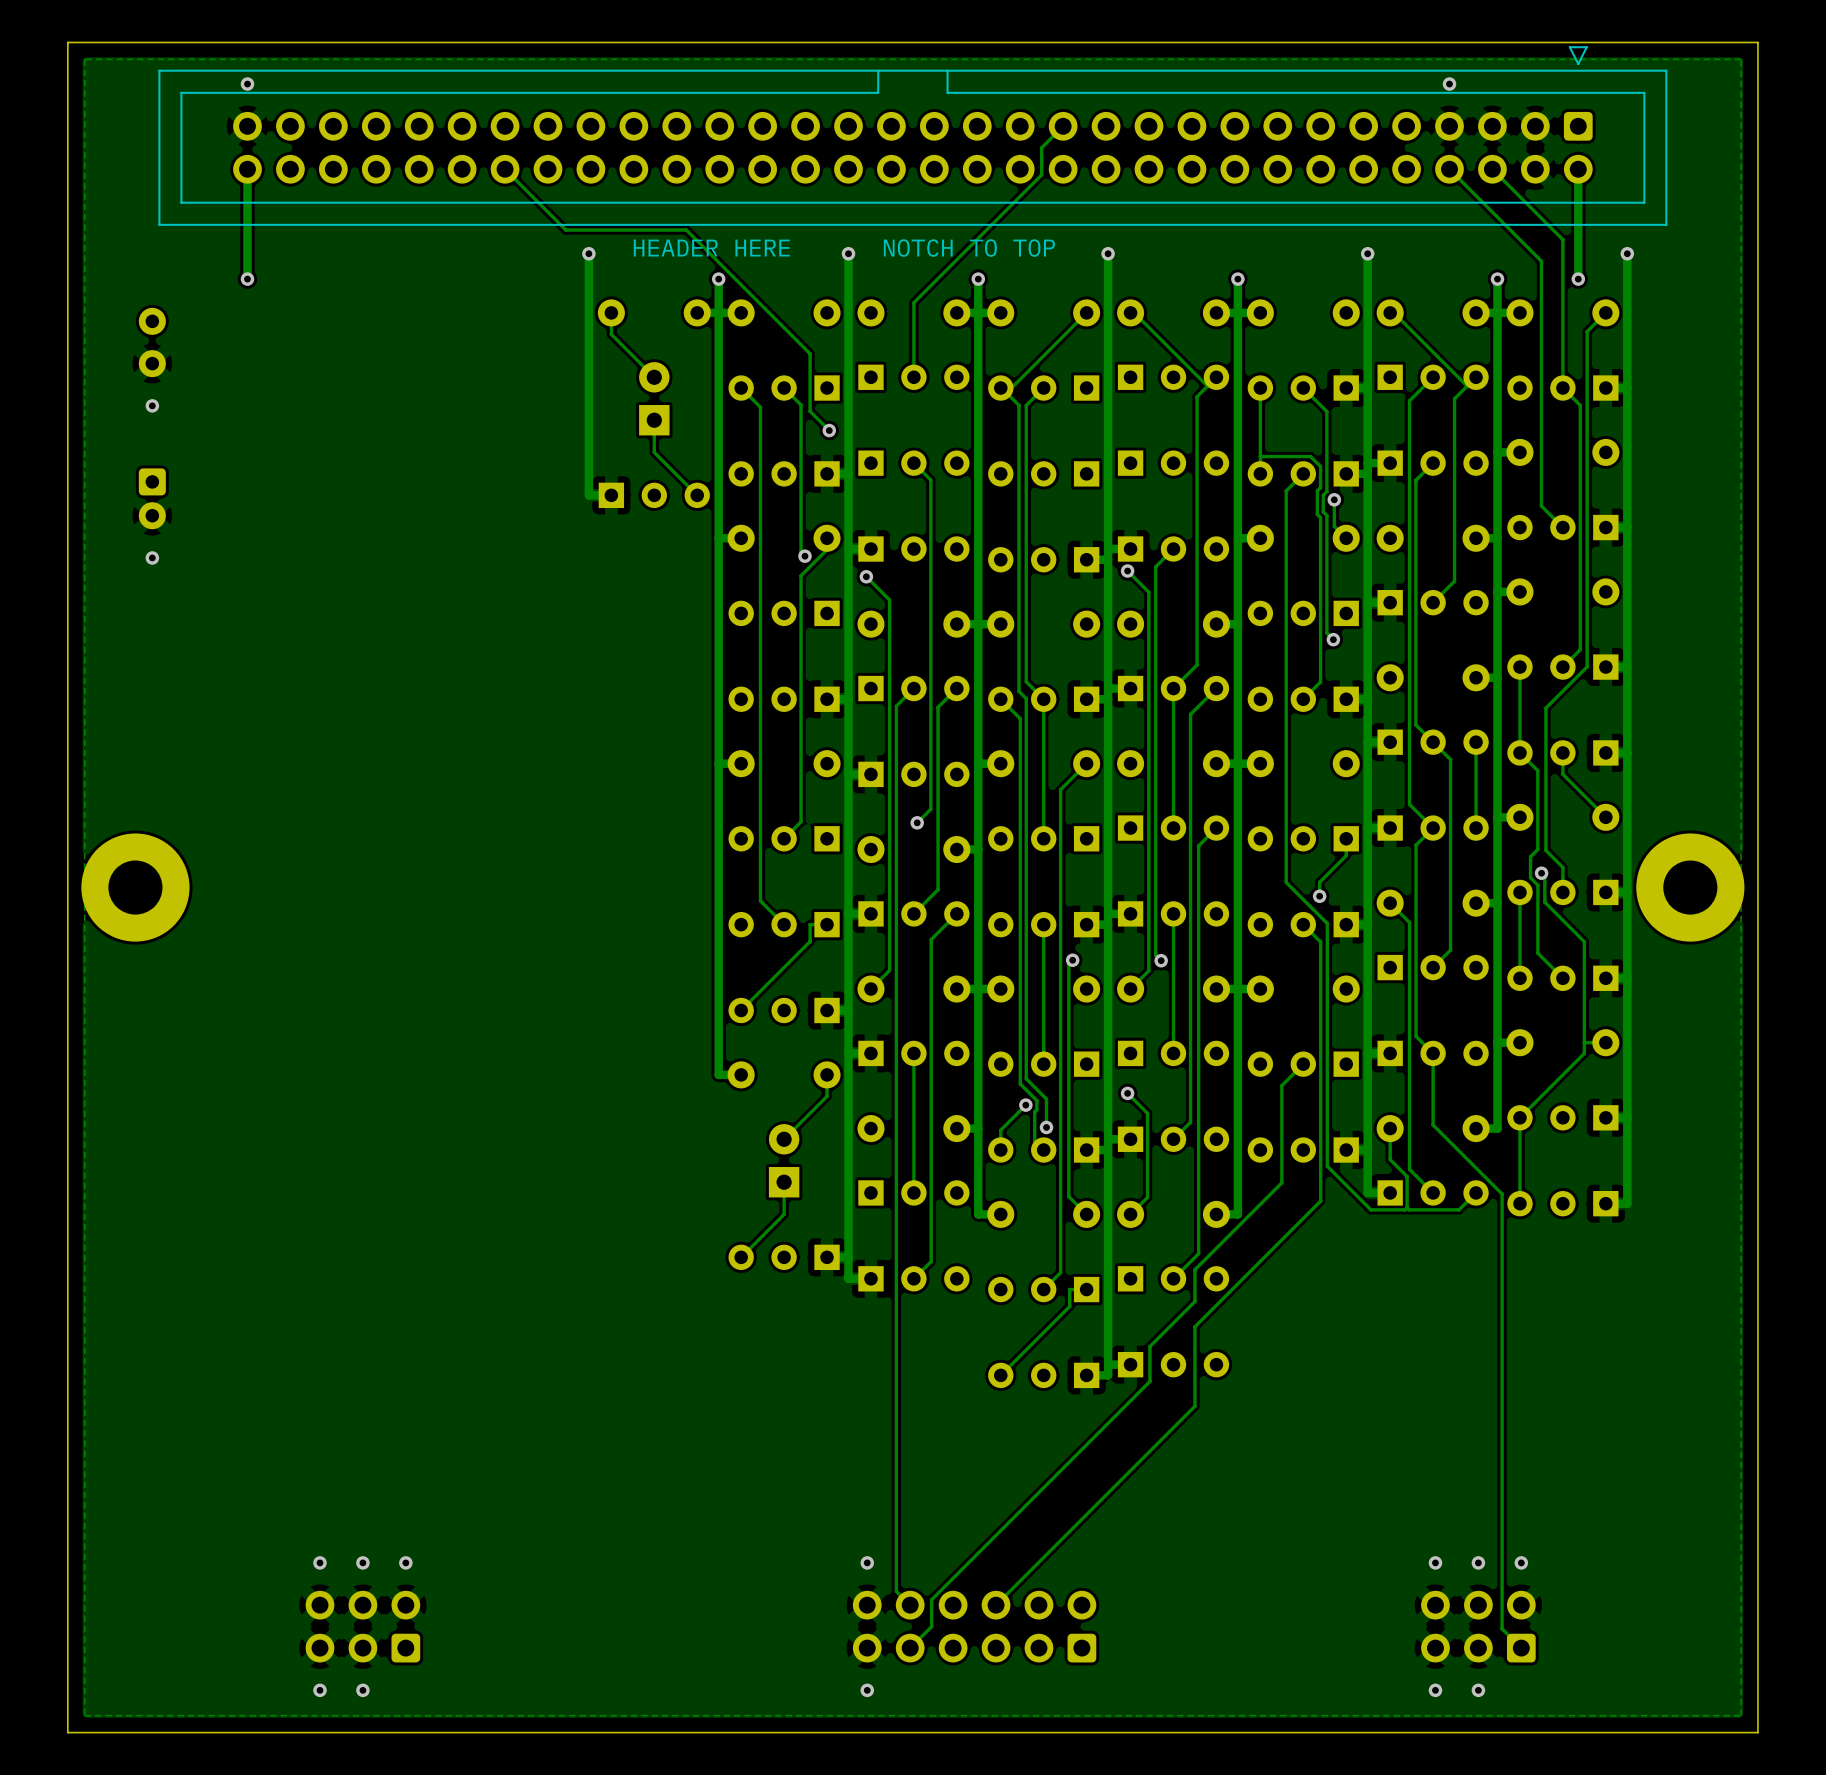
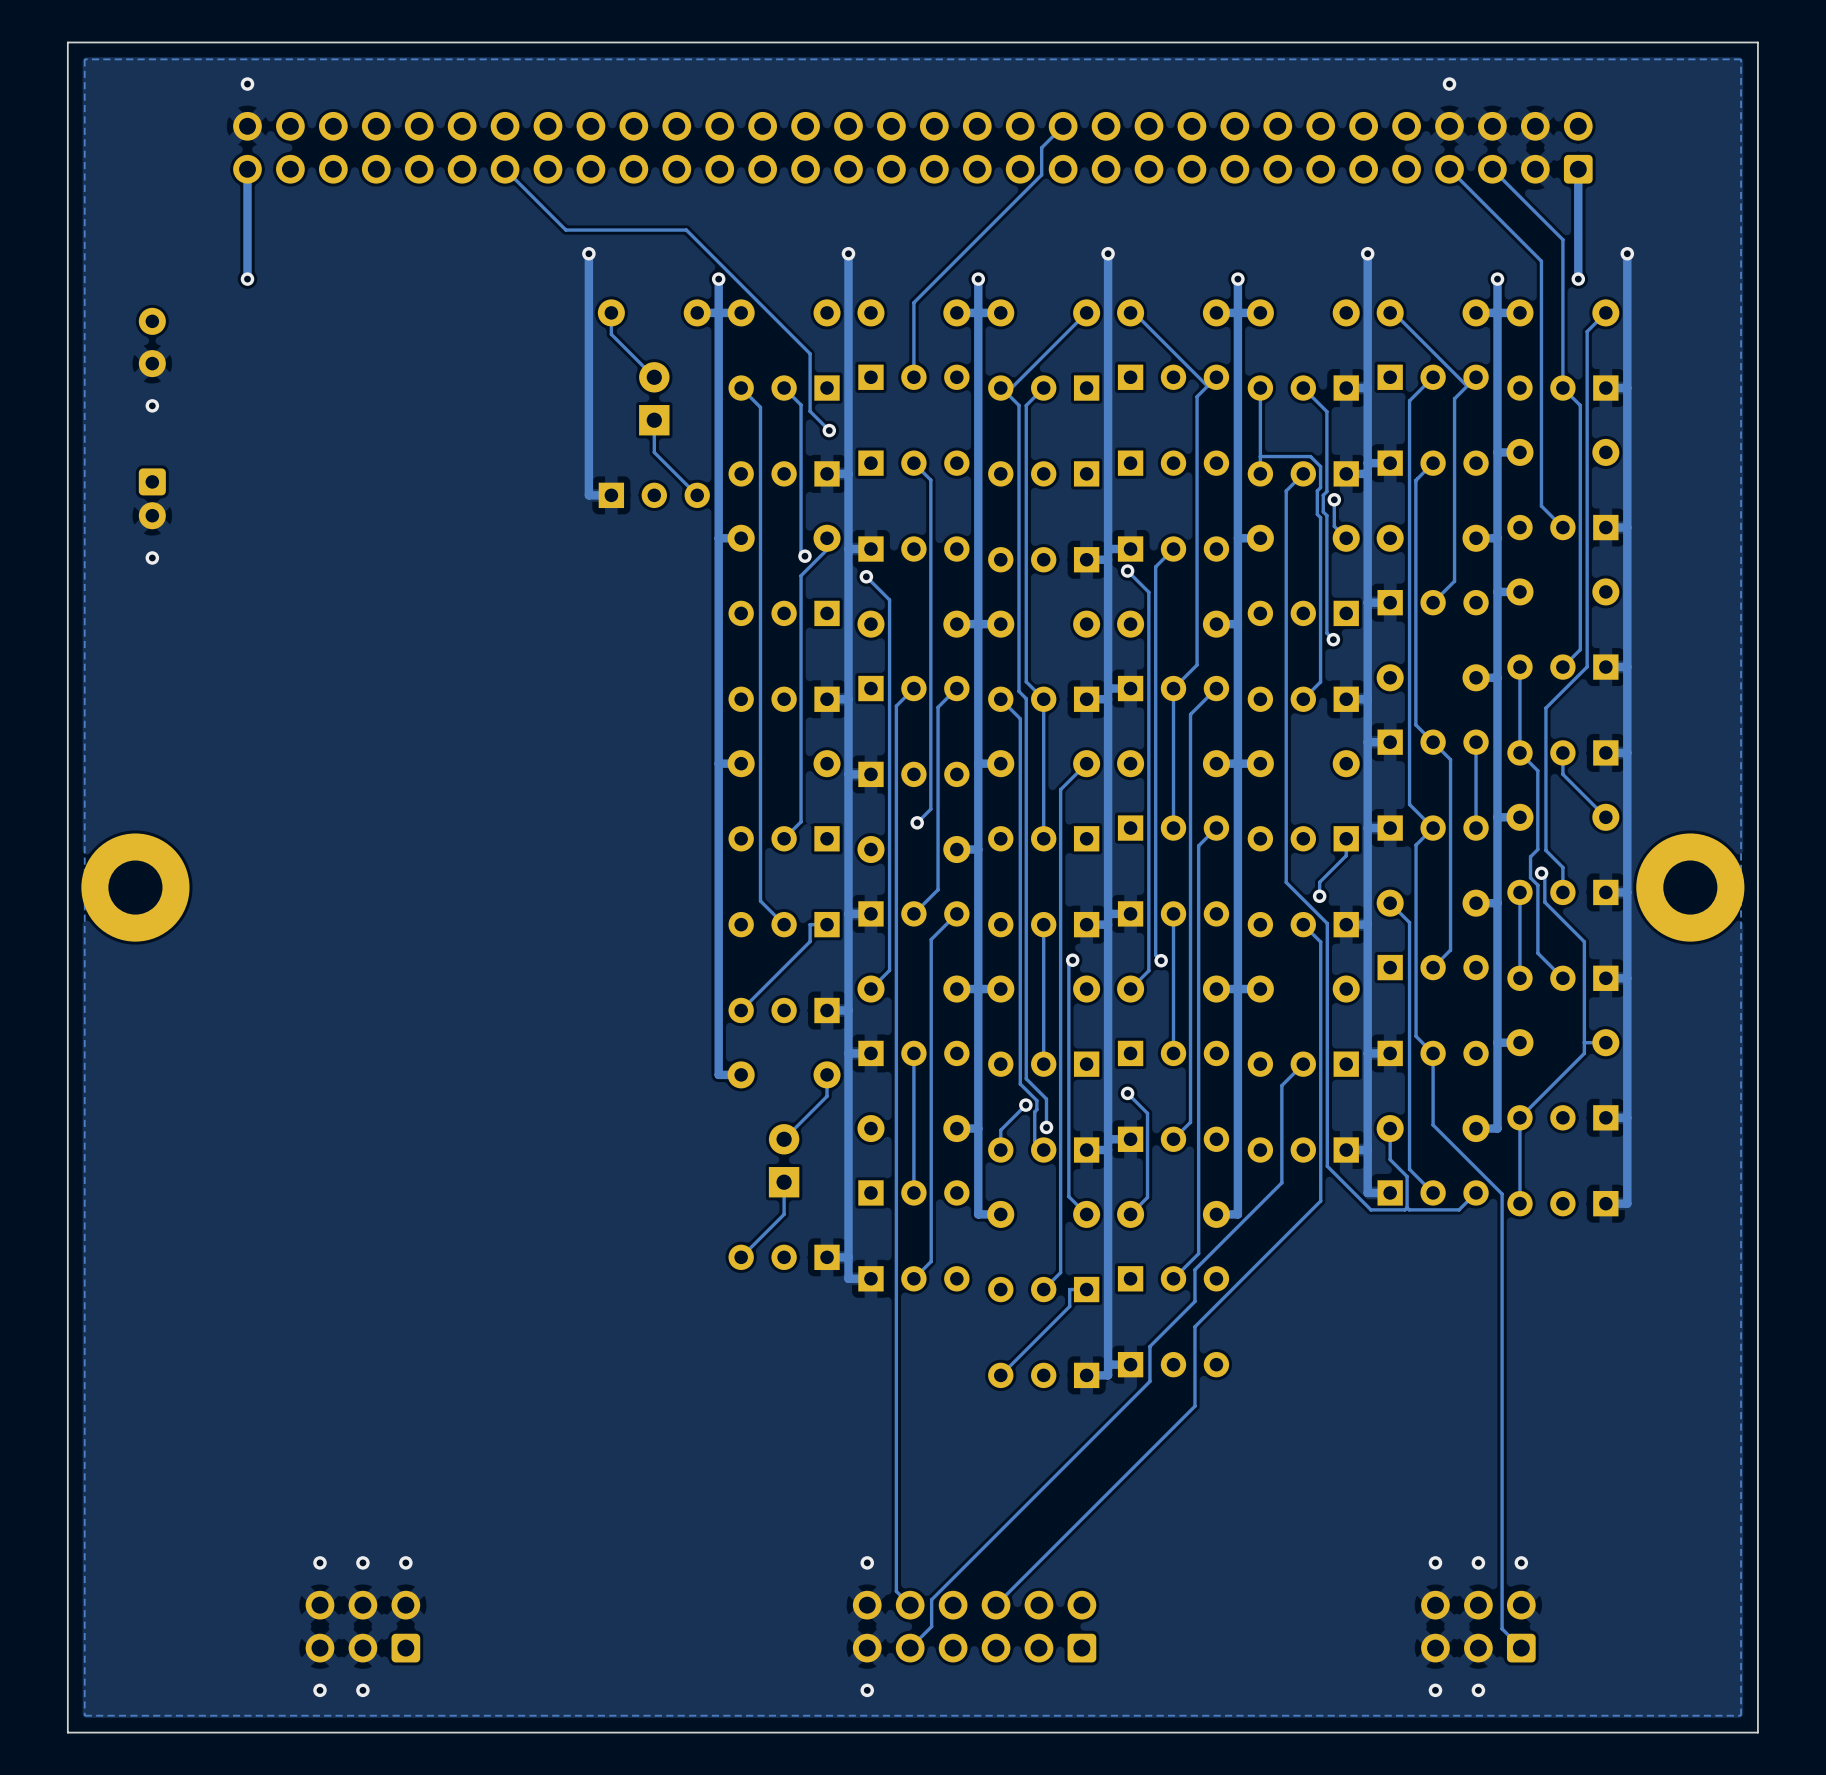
part side: bottom (912, 136) -> top (912, 147)
text: HEADER HERE (711, 248) -> none
text: NOTCH TO TOP (969, 248) -> none

